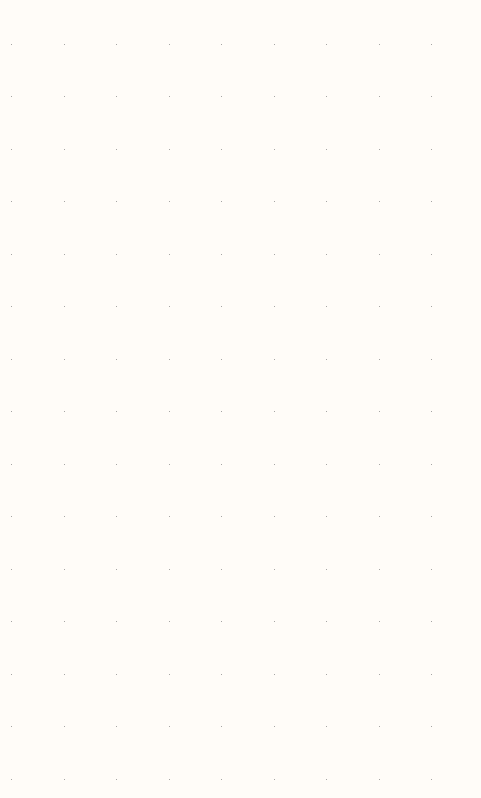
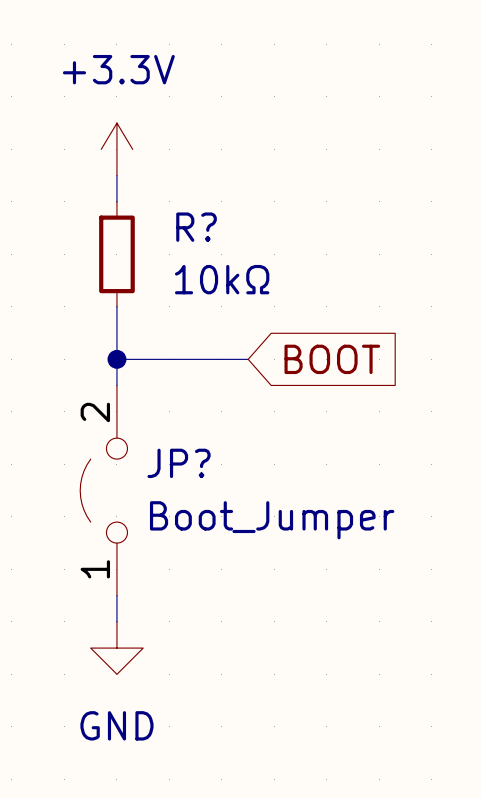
power symbol: none -> +3.3V (116, 149)
wire: none -> (116, 175) (116, 201)
R?: none -> 10kΩ (116, 254)
wire: none -> (116, 306) (116, 385)
wire: none -> (116, 359) (248, 359)
junction: none -> (116, 359)
global label: none -> BOOT (332, 359)
JP?: none -> Boot_Jumper (103, 490)
wire: none -> (116, 595) (116, 621)
power symbol: none -> GND (116, 648)

